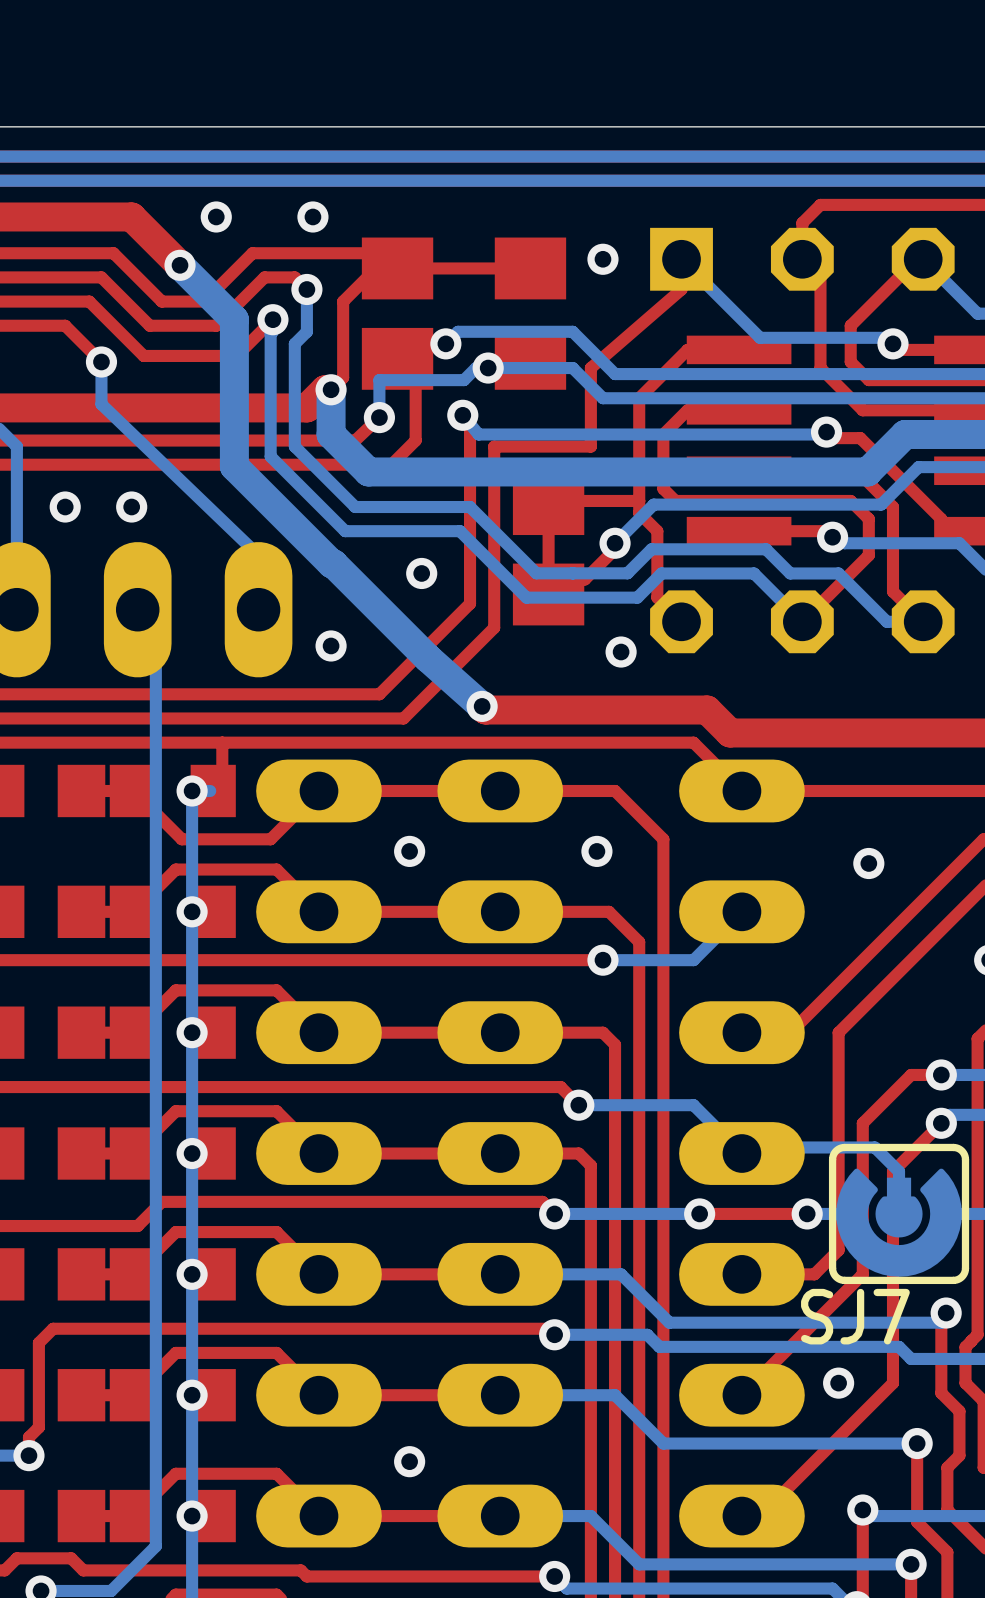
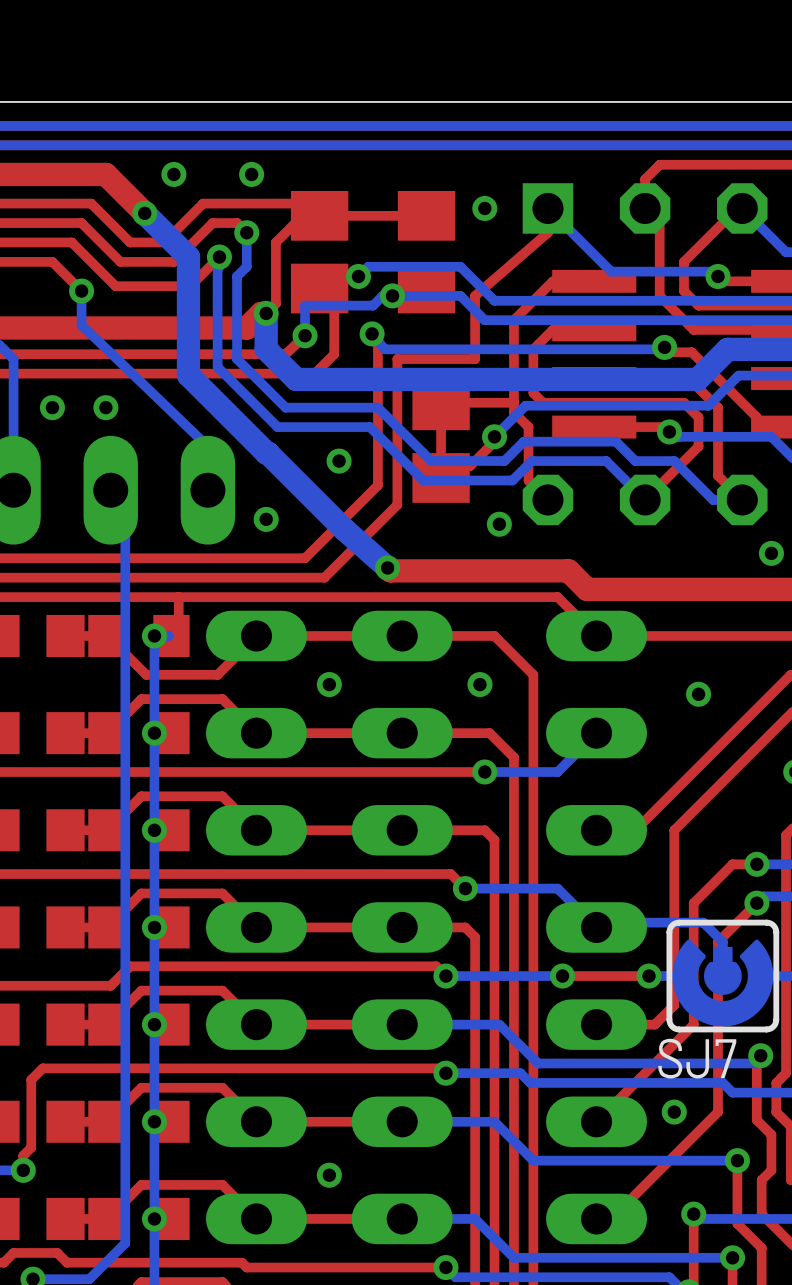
via: none -> (771, 553)

